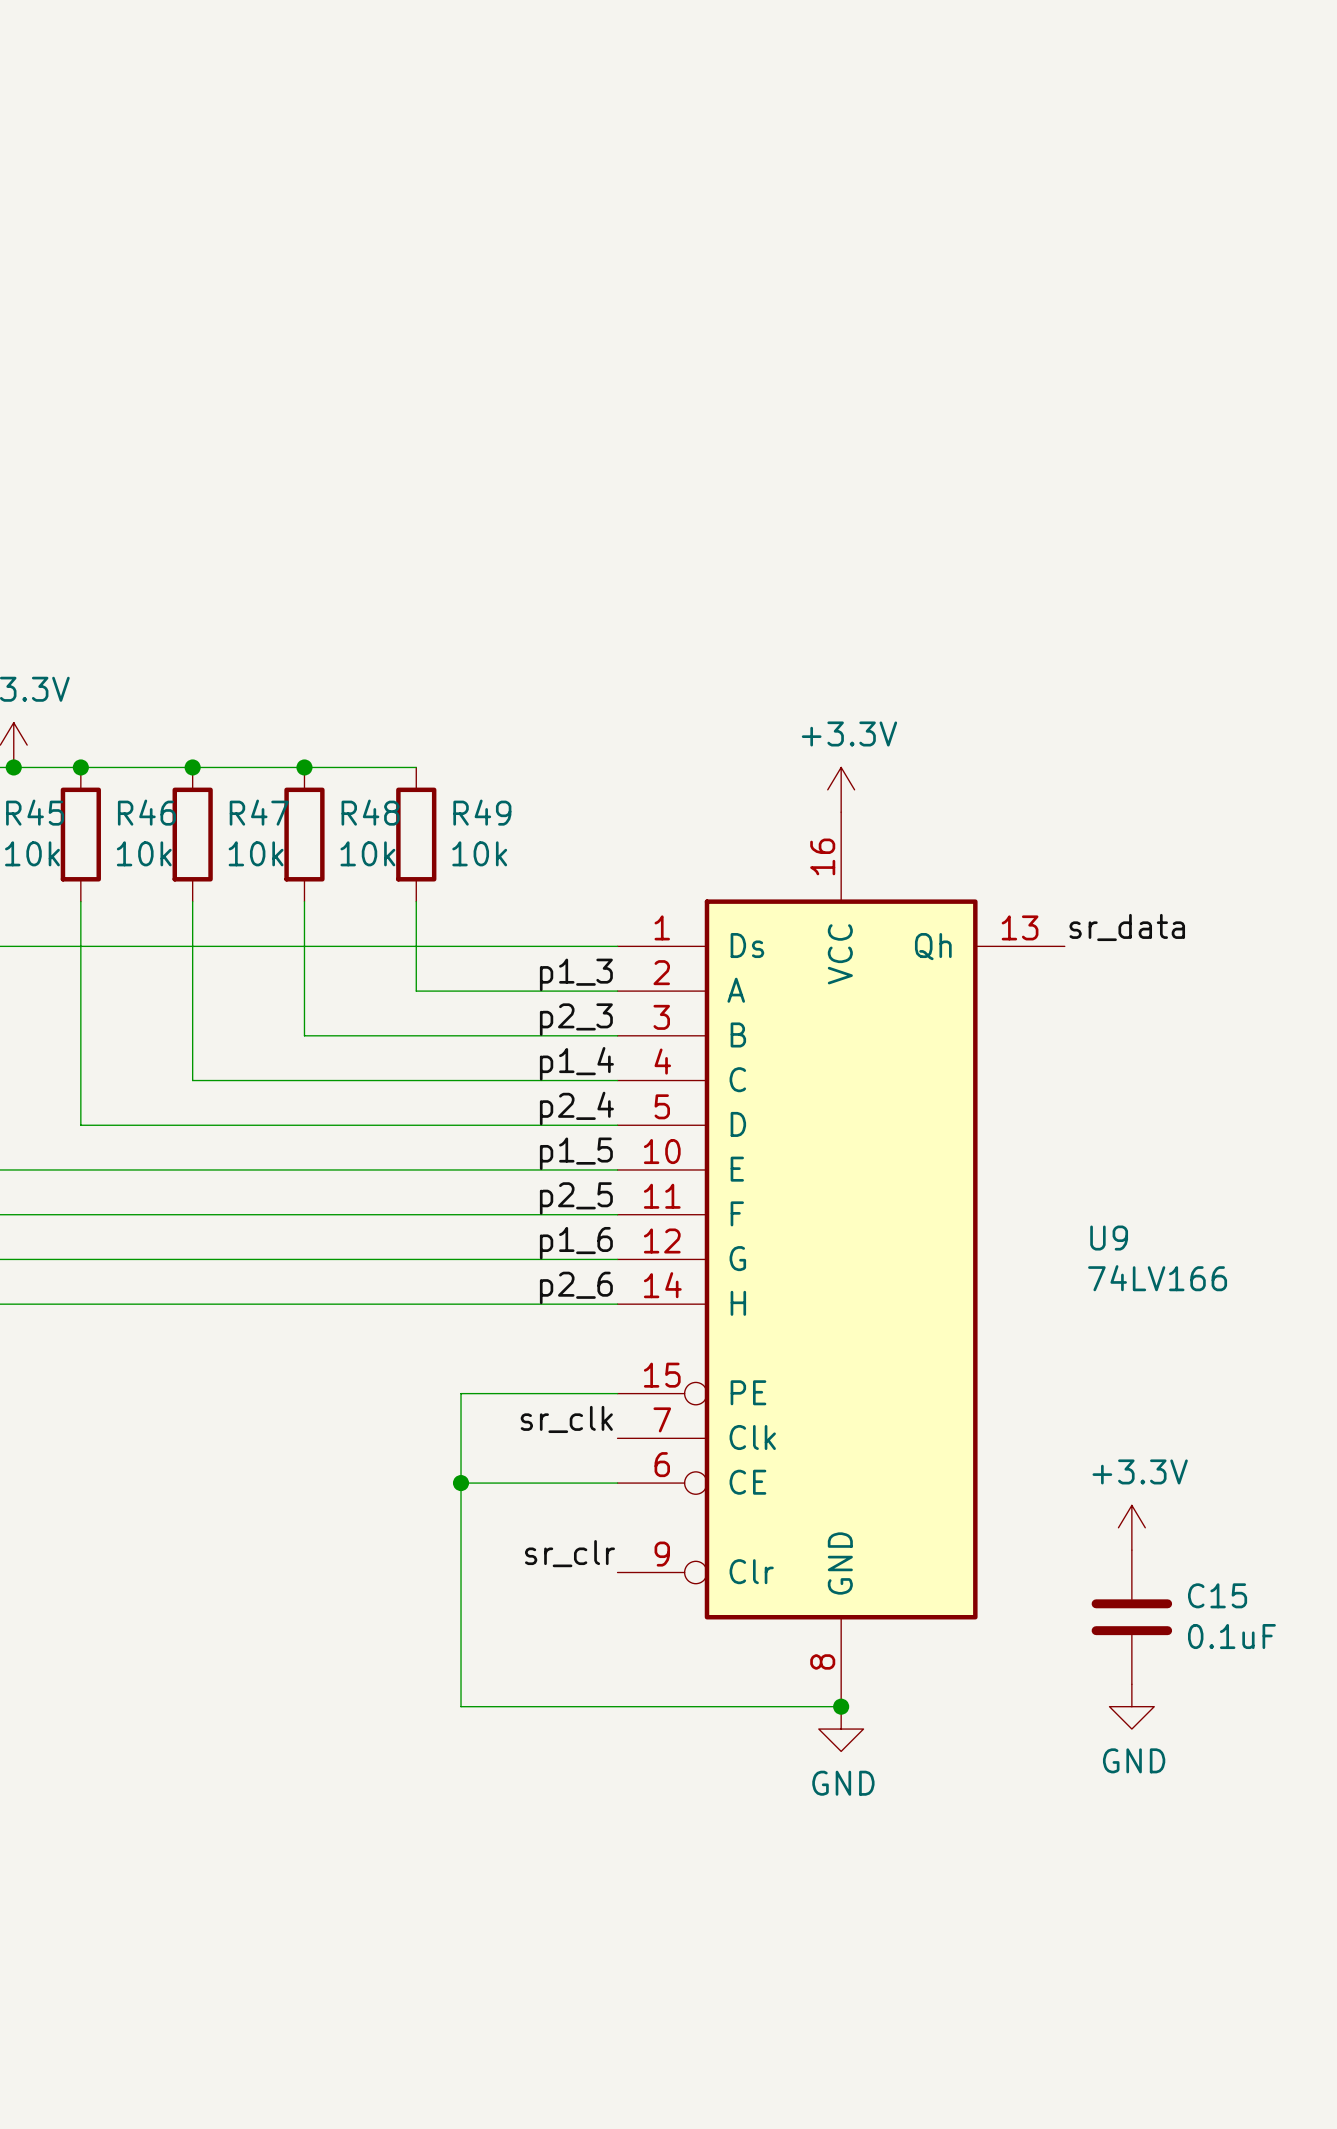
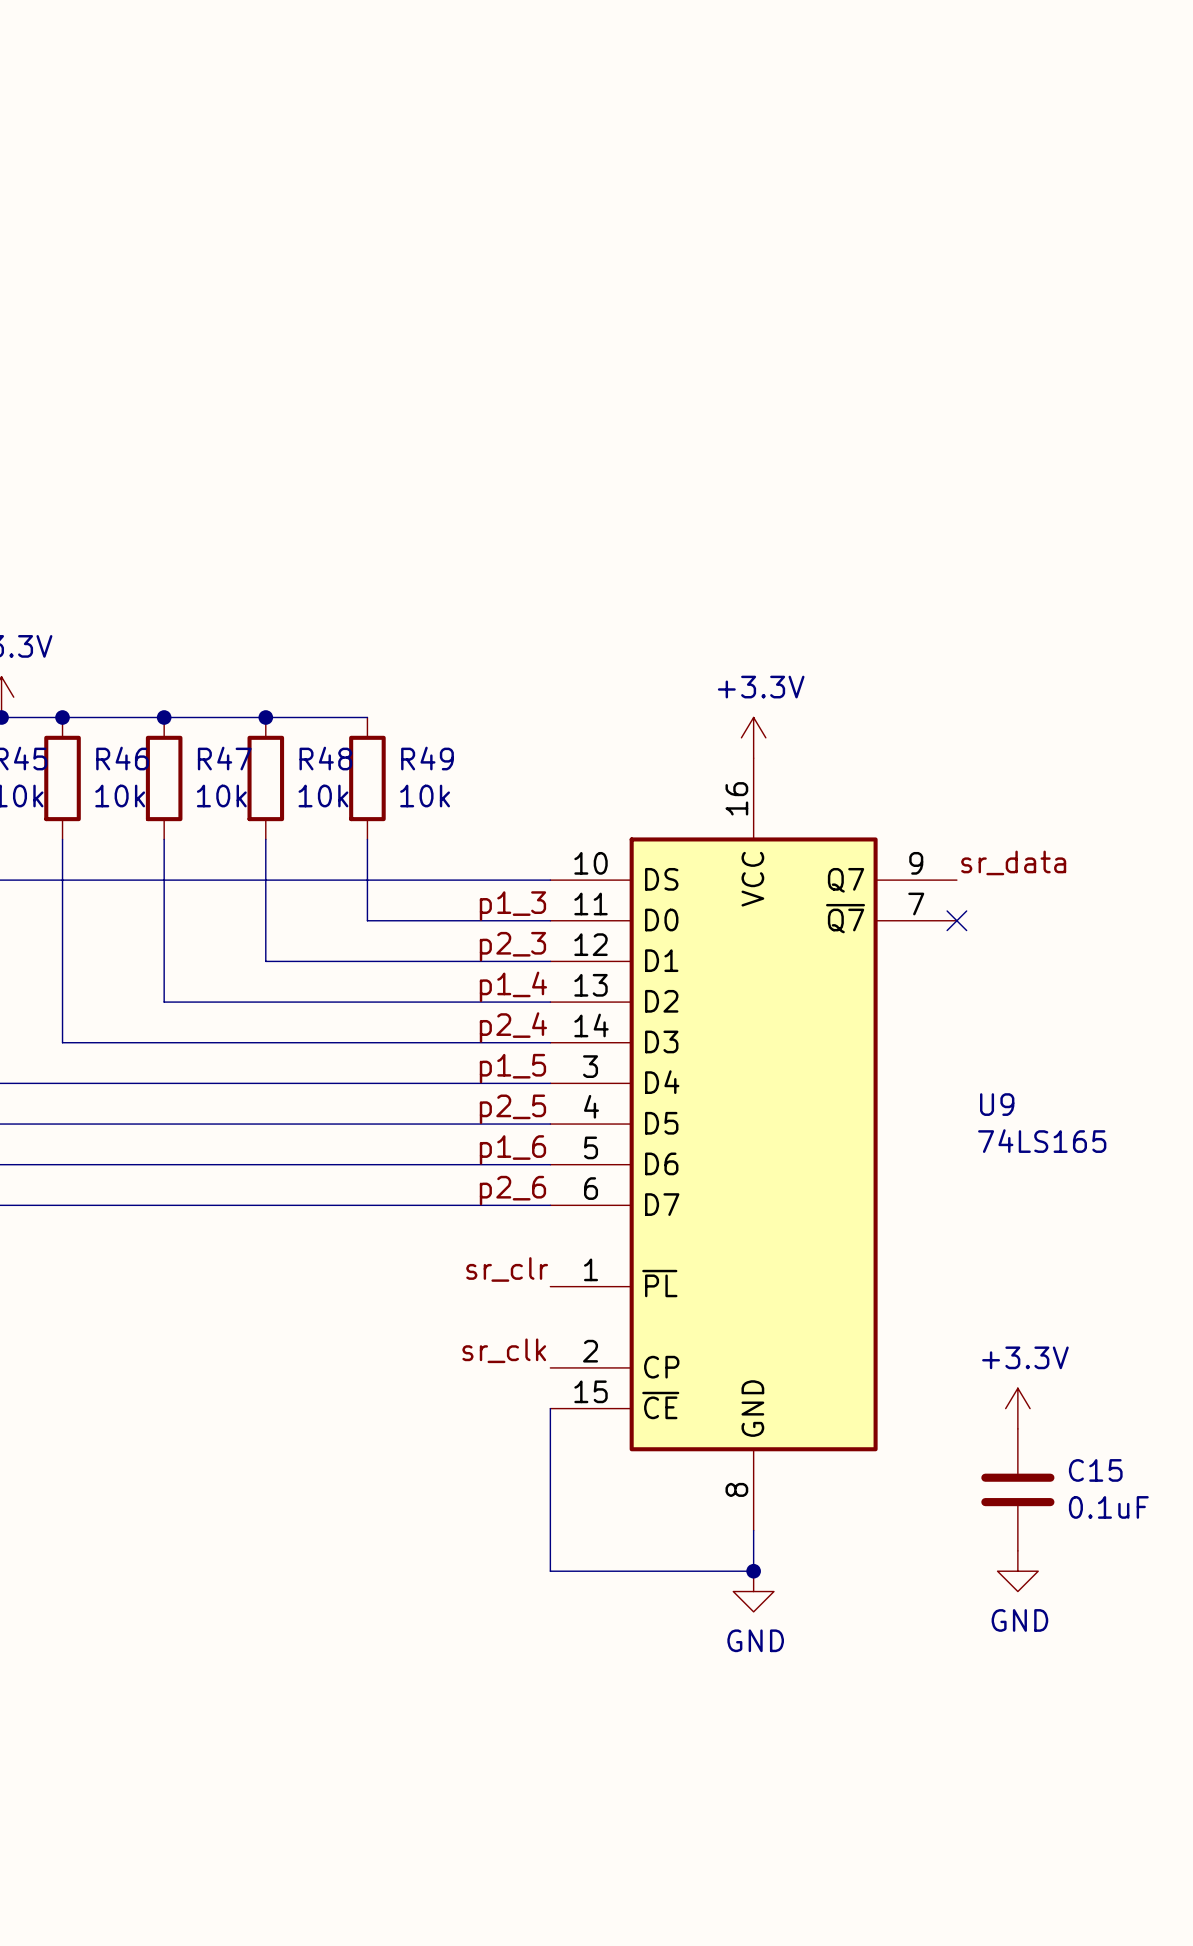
U9 symbol: [617, 812, 1065, 1707] -> [550, 758, 957, 1531]
no-connect mark: none -> (956, 920)
U9 value: 74LV166 (1157, 1278) -> 74LS165 (1042, 1141)
wire: (617, 1393) (461, 1393) (461, 1706) (617, 1706) -> (550, 1408) (550, 1571)
label position: sr_clk (566, 1419) -> sr_clk (504, 1350)
wire: (461, 1483) (617, 1483) -> none
junction: (461, 1483) -> none
label position: sr_clr (569, 1553) -> sr_clr (507, 1269)

